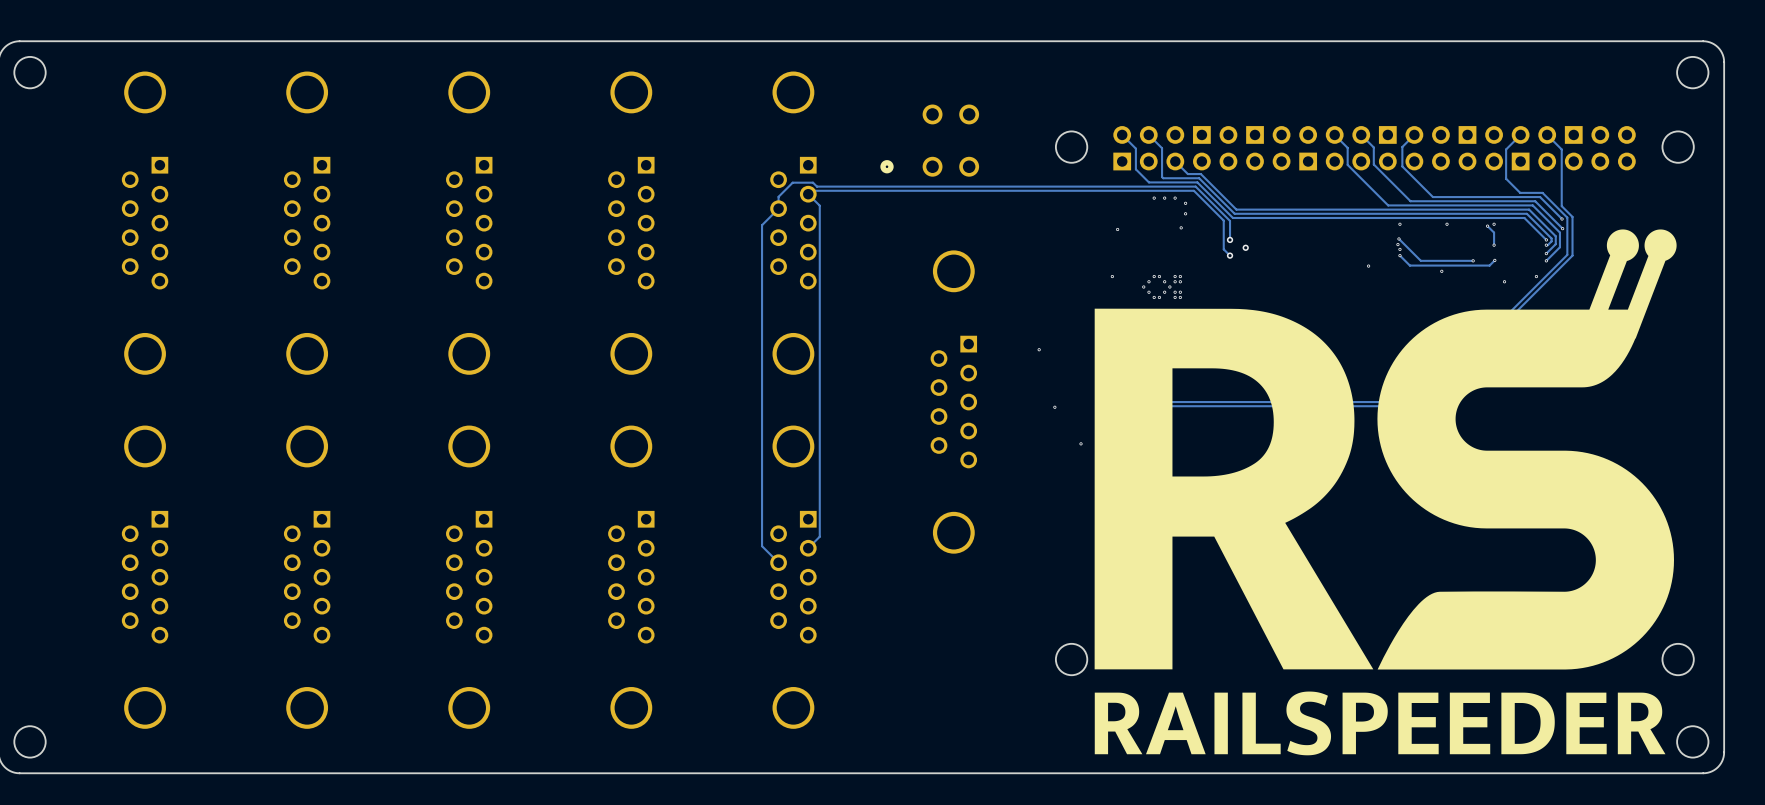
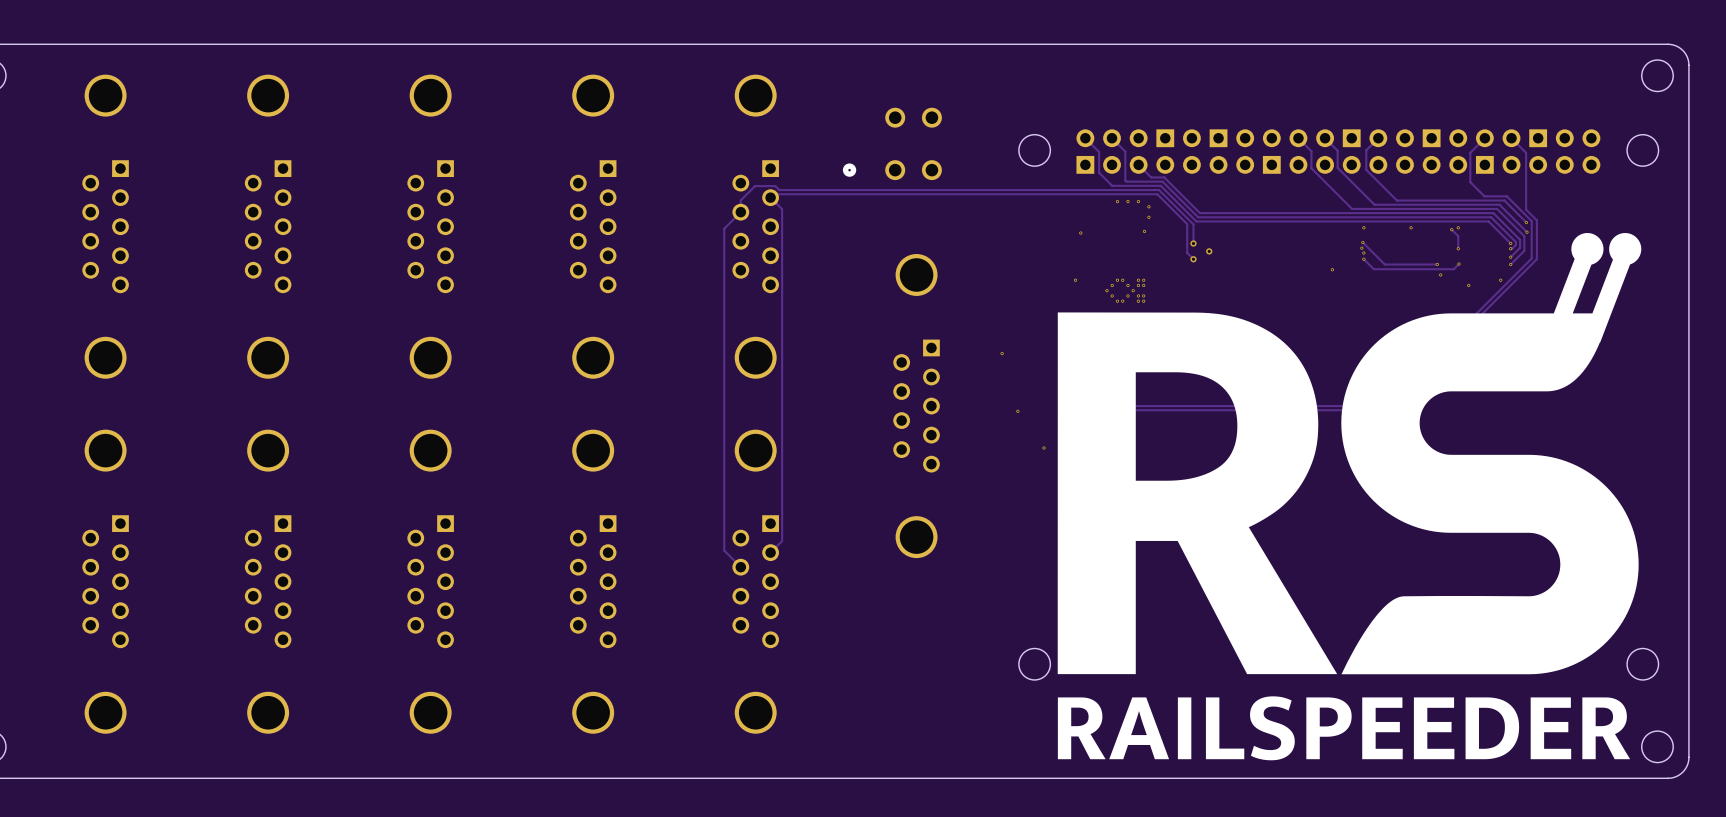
via position: (1441, 271) -> (1440, 274)

